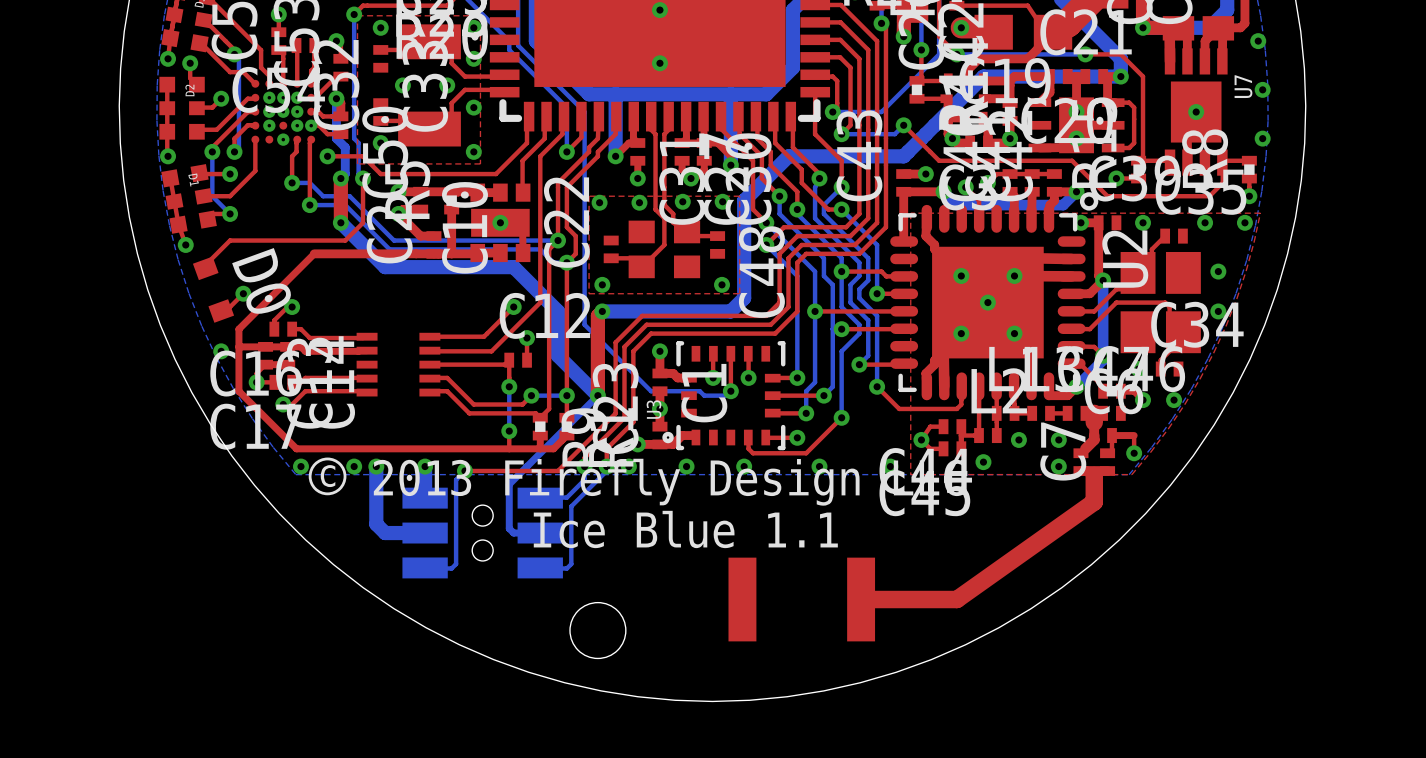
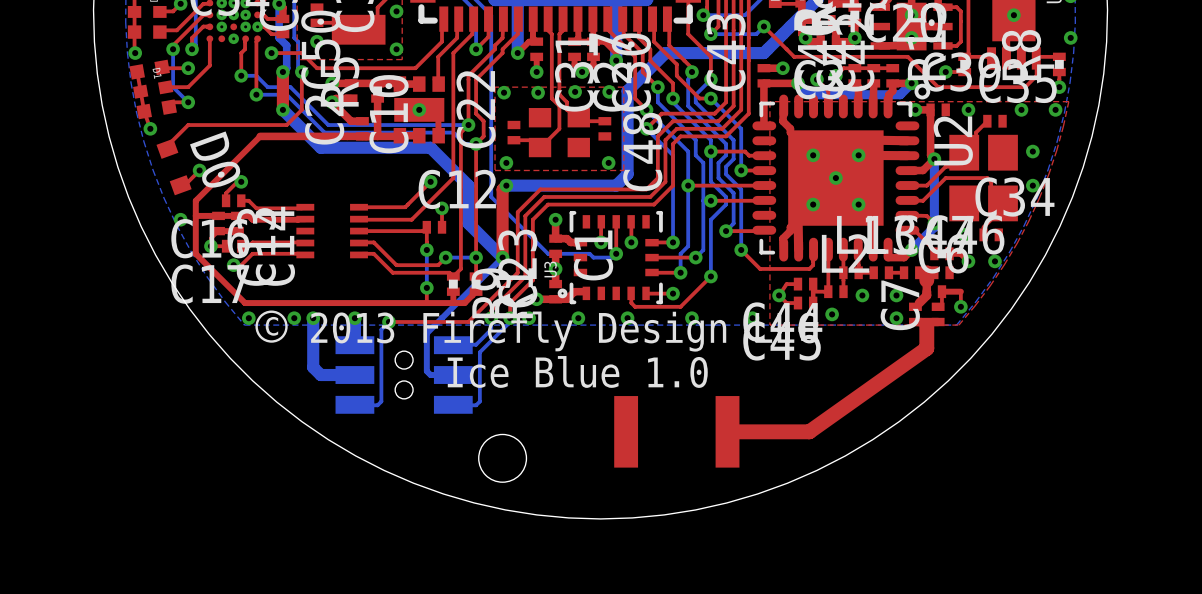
text: Ice Blue 1.1 (685, 529) -> Ice Blue 1.0 (577, 371)

